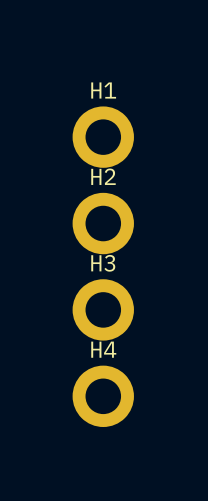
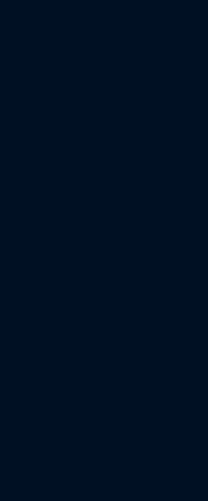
H1: (103, 137) -> none
H2: (103, 223) -> none
H3: (103, 309) -> none
H4: (103, 396) -> none

